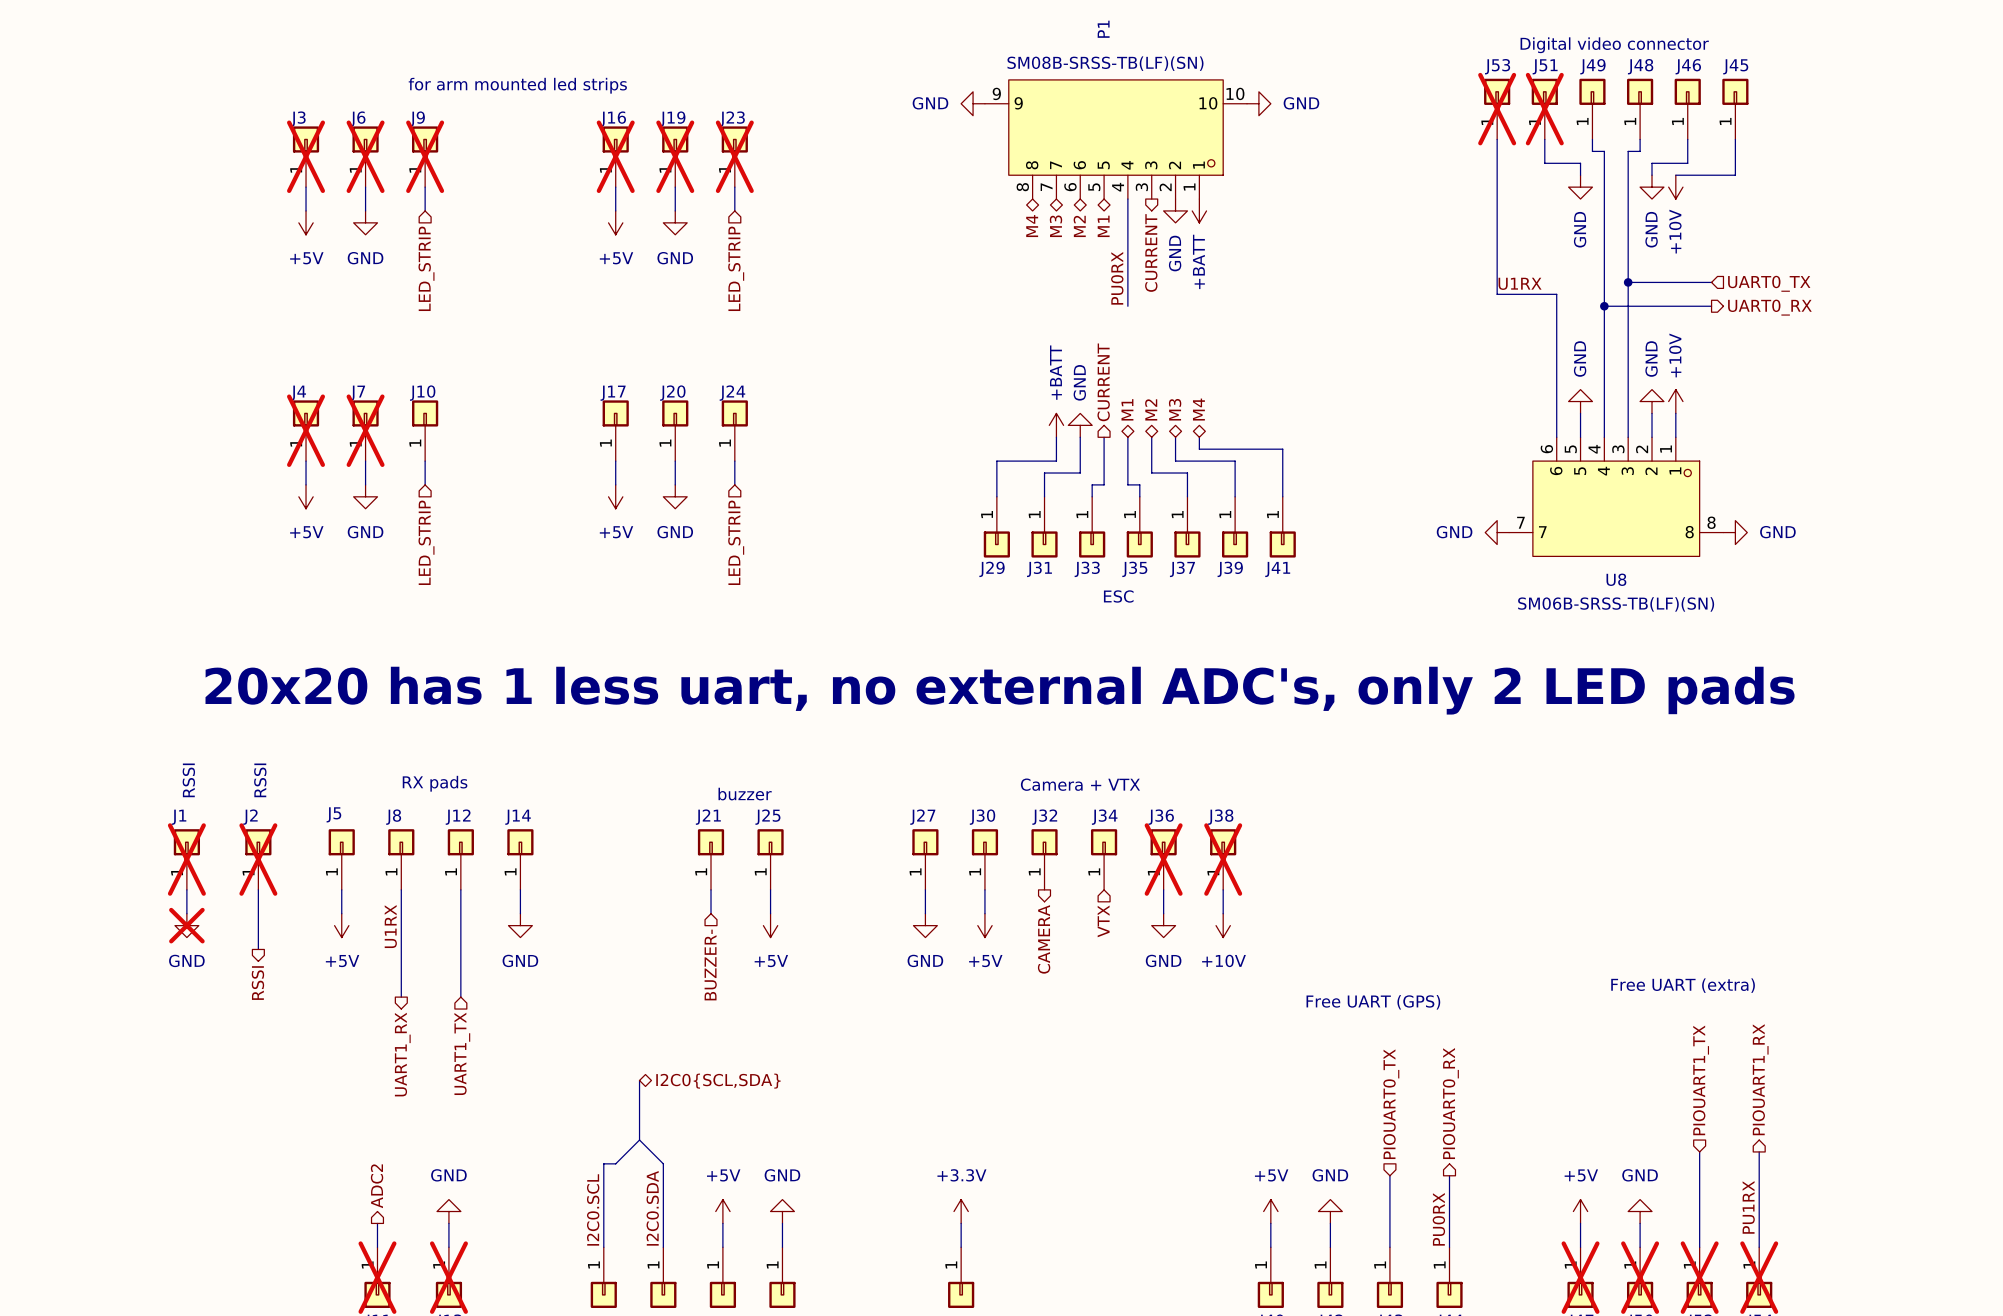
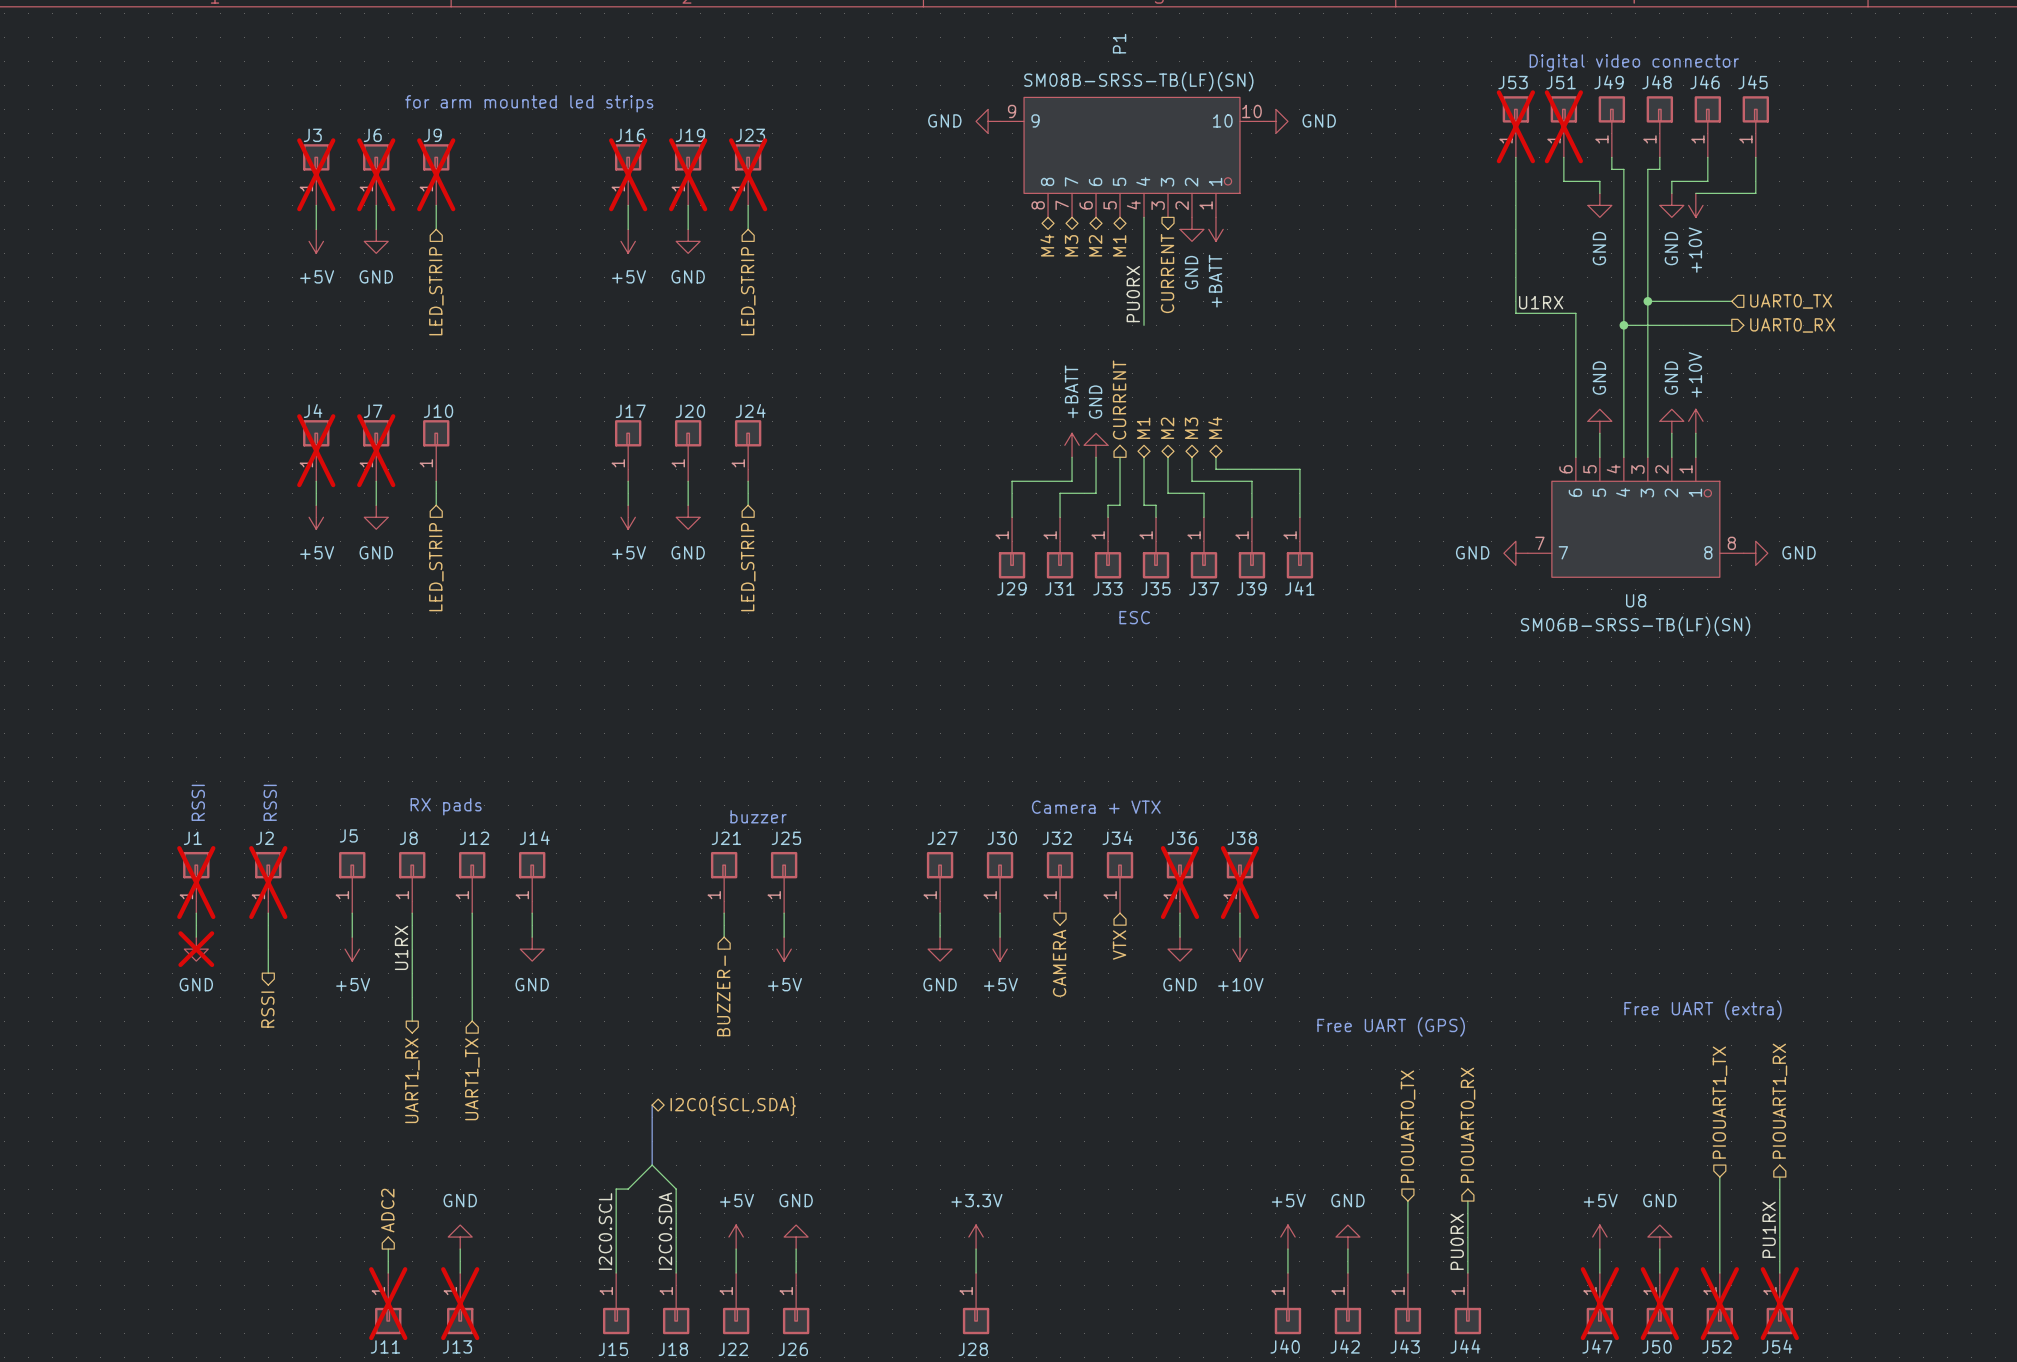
text: 20x20 has 1 less uart, no external ADC's, only 2 LED pads (1000, 690) -> none

